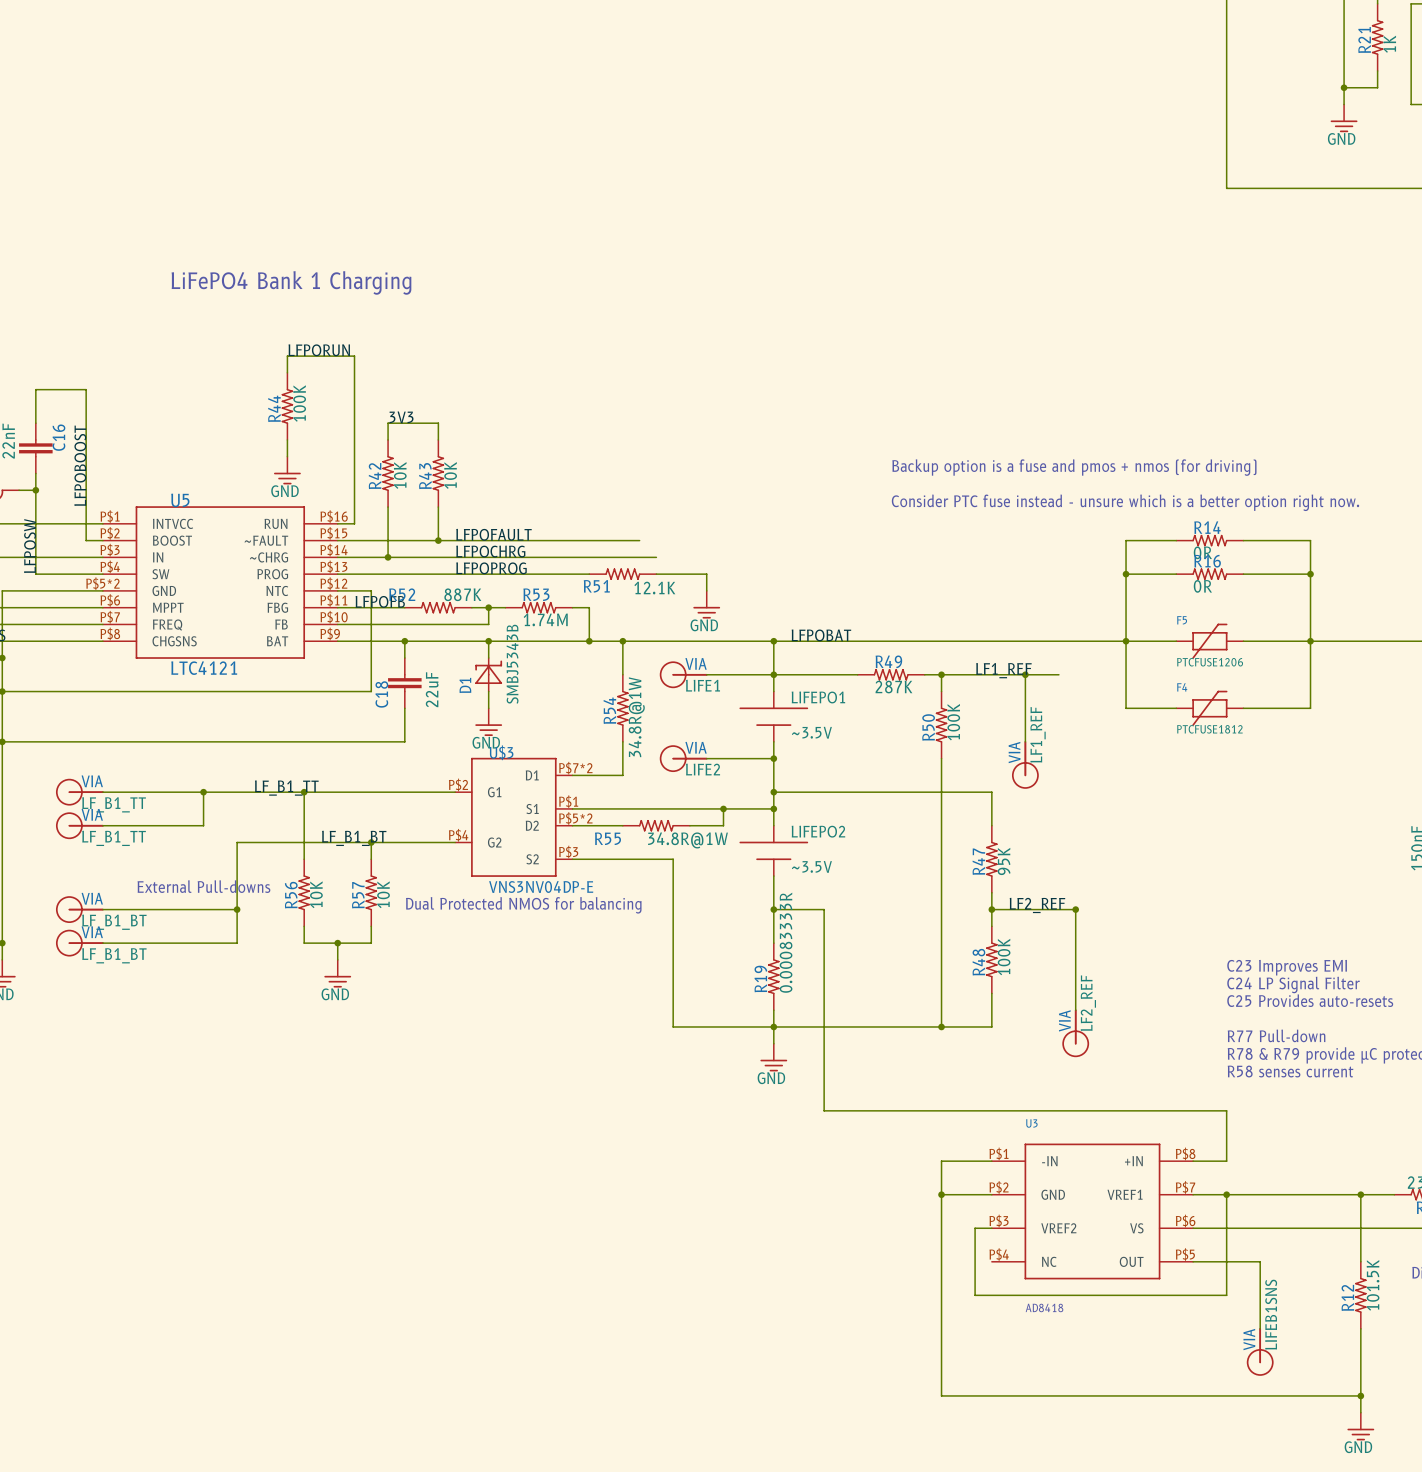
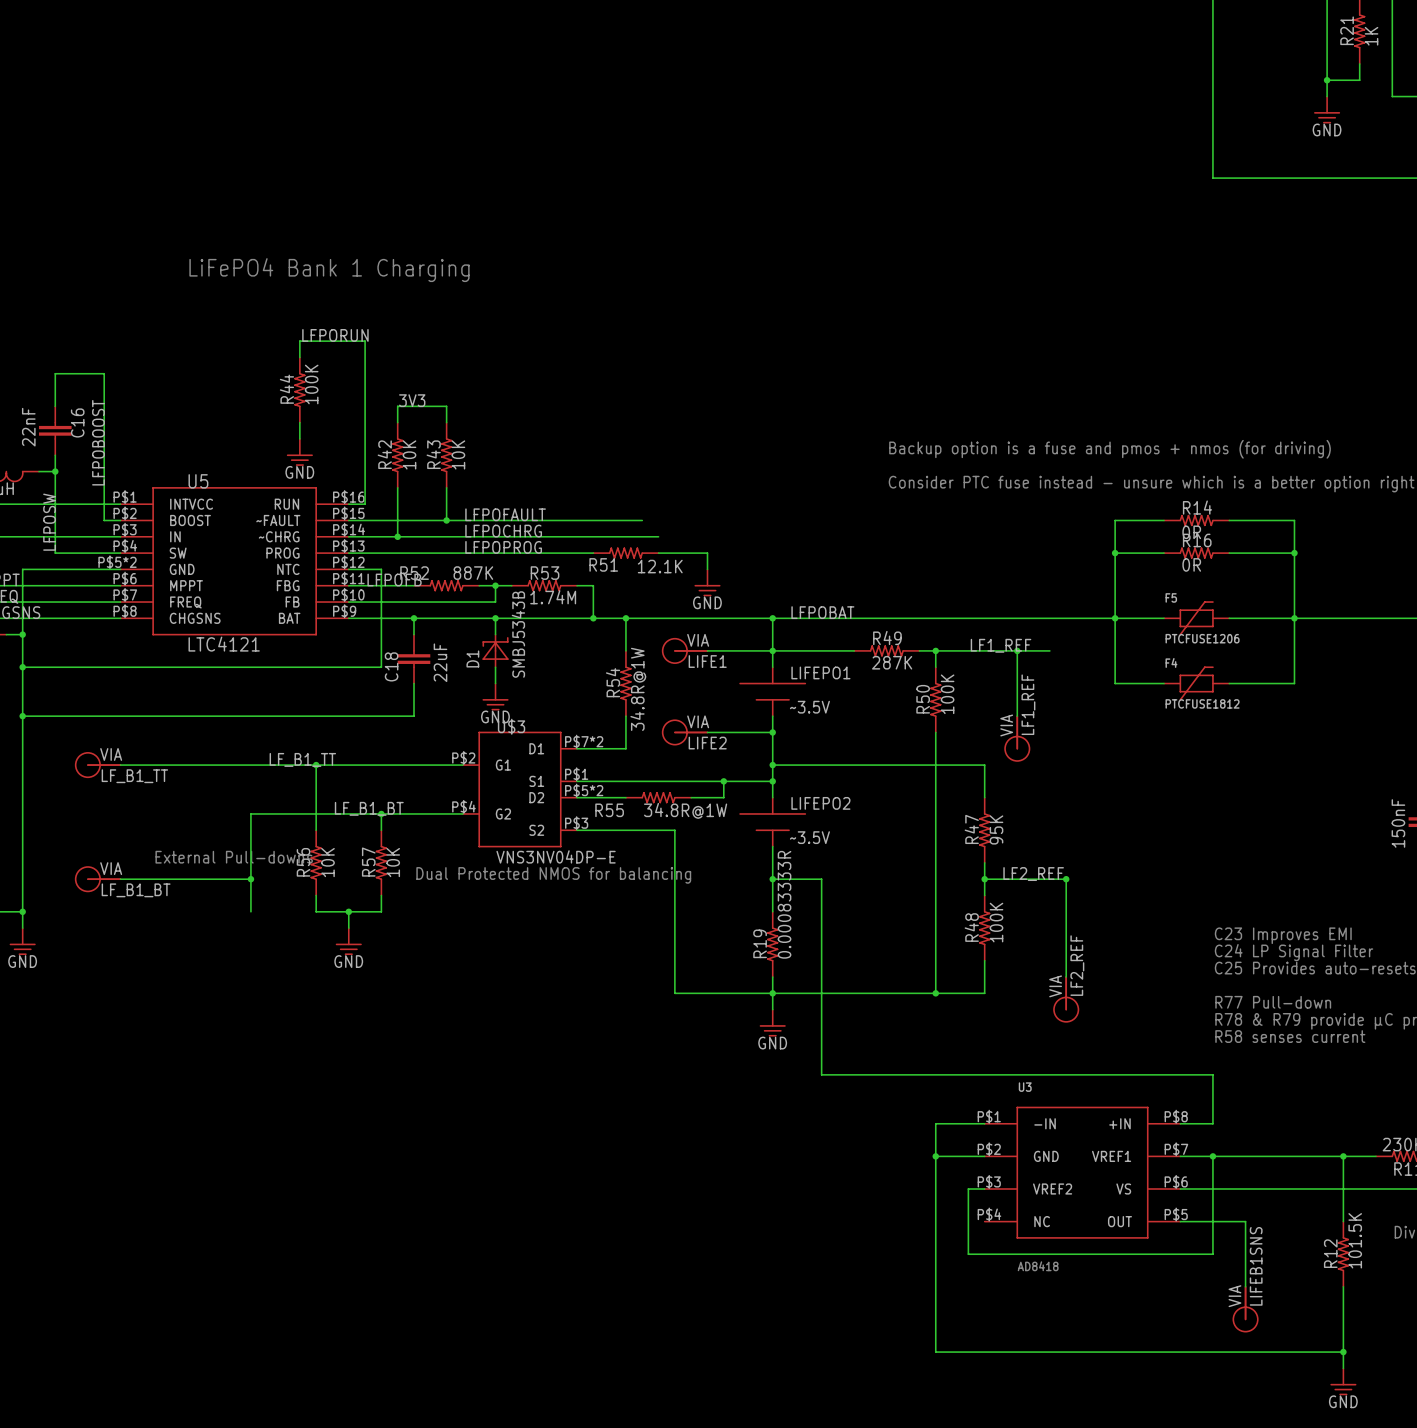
wire: (203, 792) (203, 825) (102, 825) -> none
junction: (203, 792) -> none
part: LF_B1_TT (79, 825) -> none
part: LF_B1_BT (79, 943) -> none
wire: (102, 943) (237, 943) -> none

